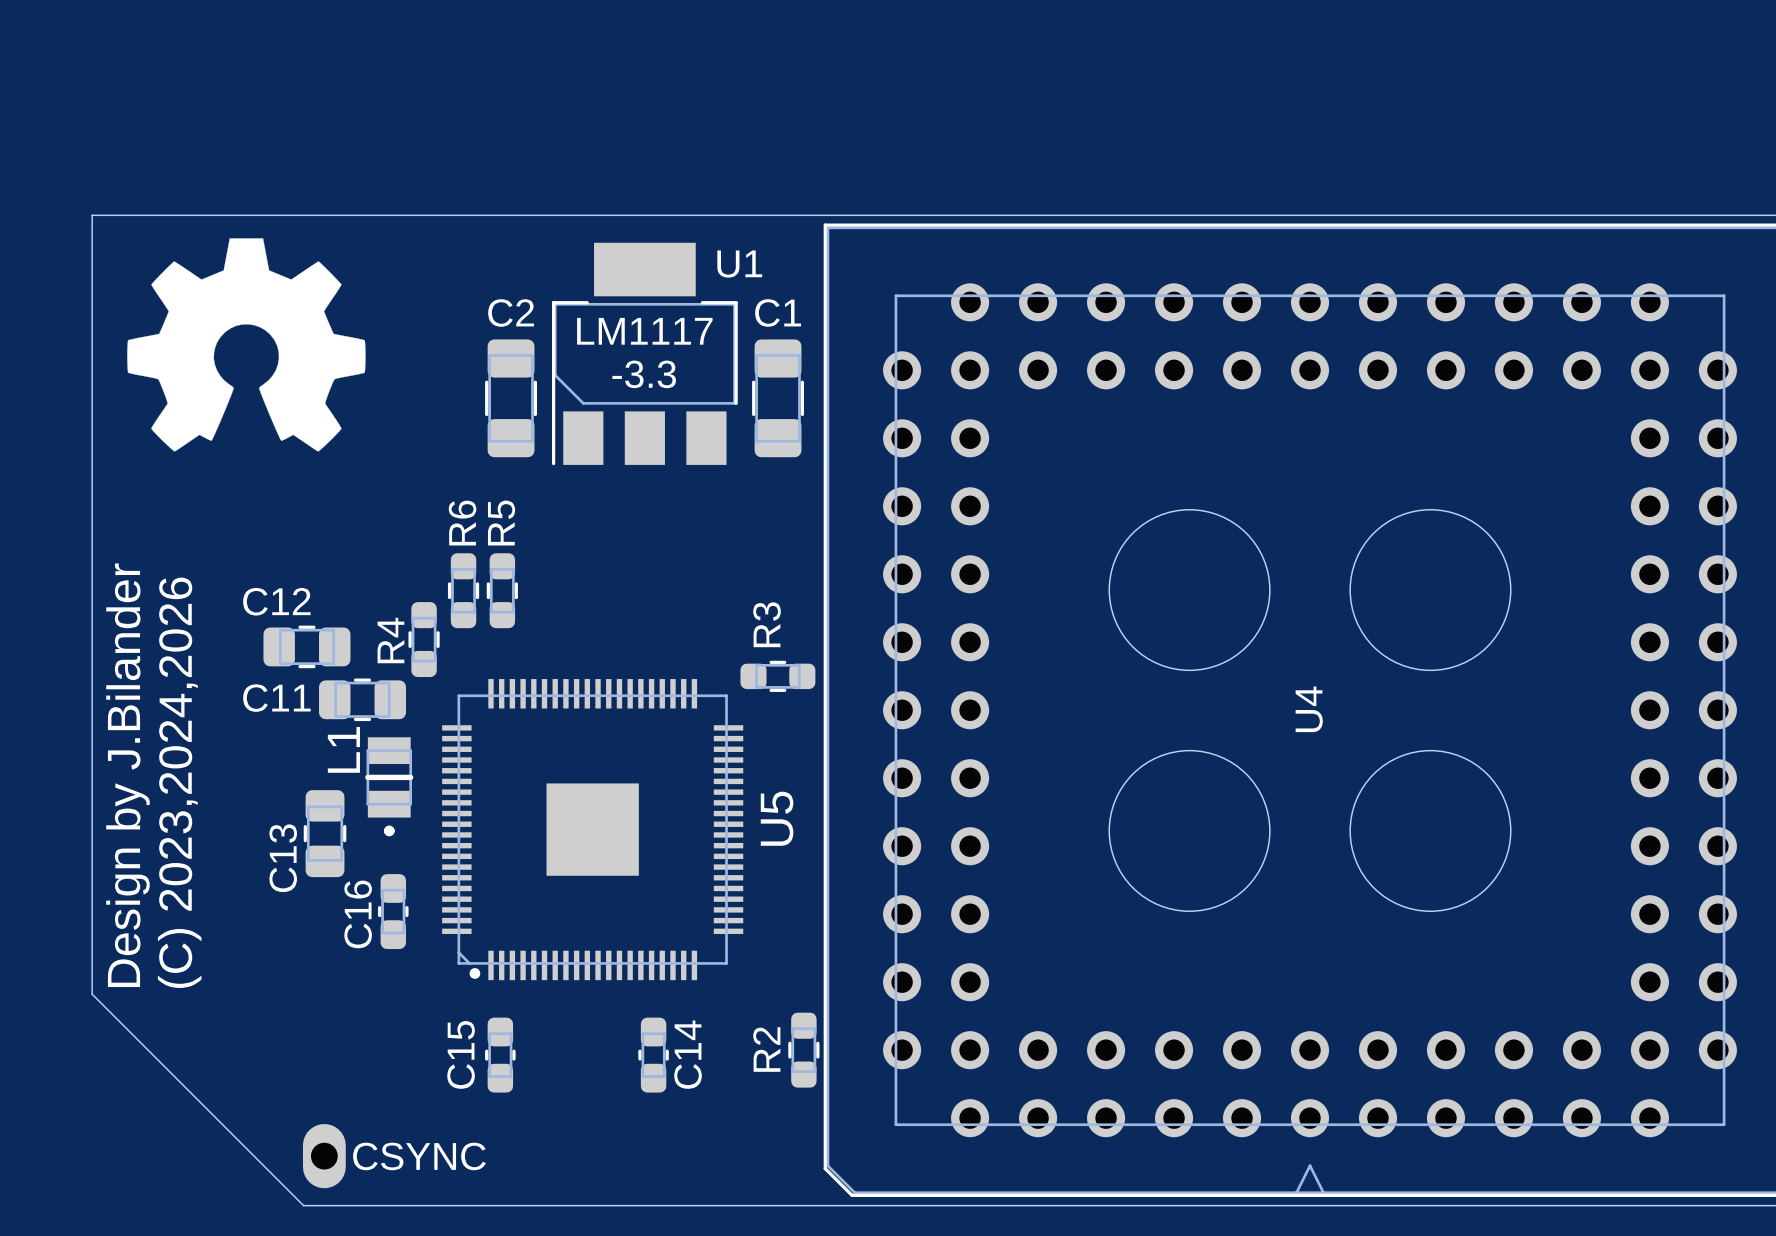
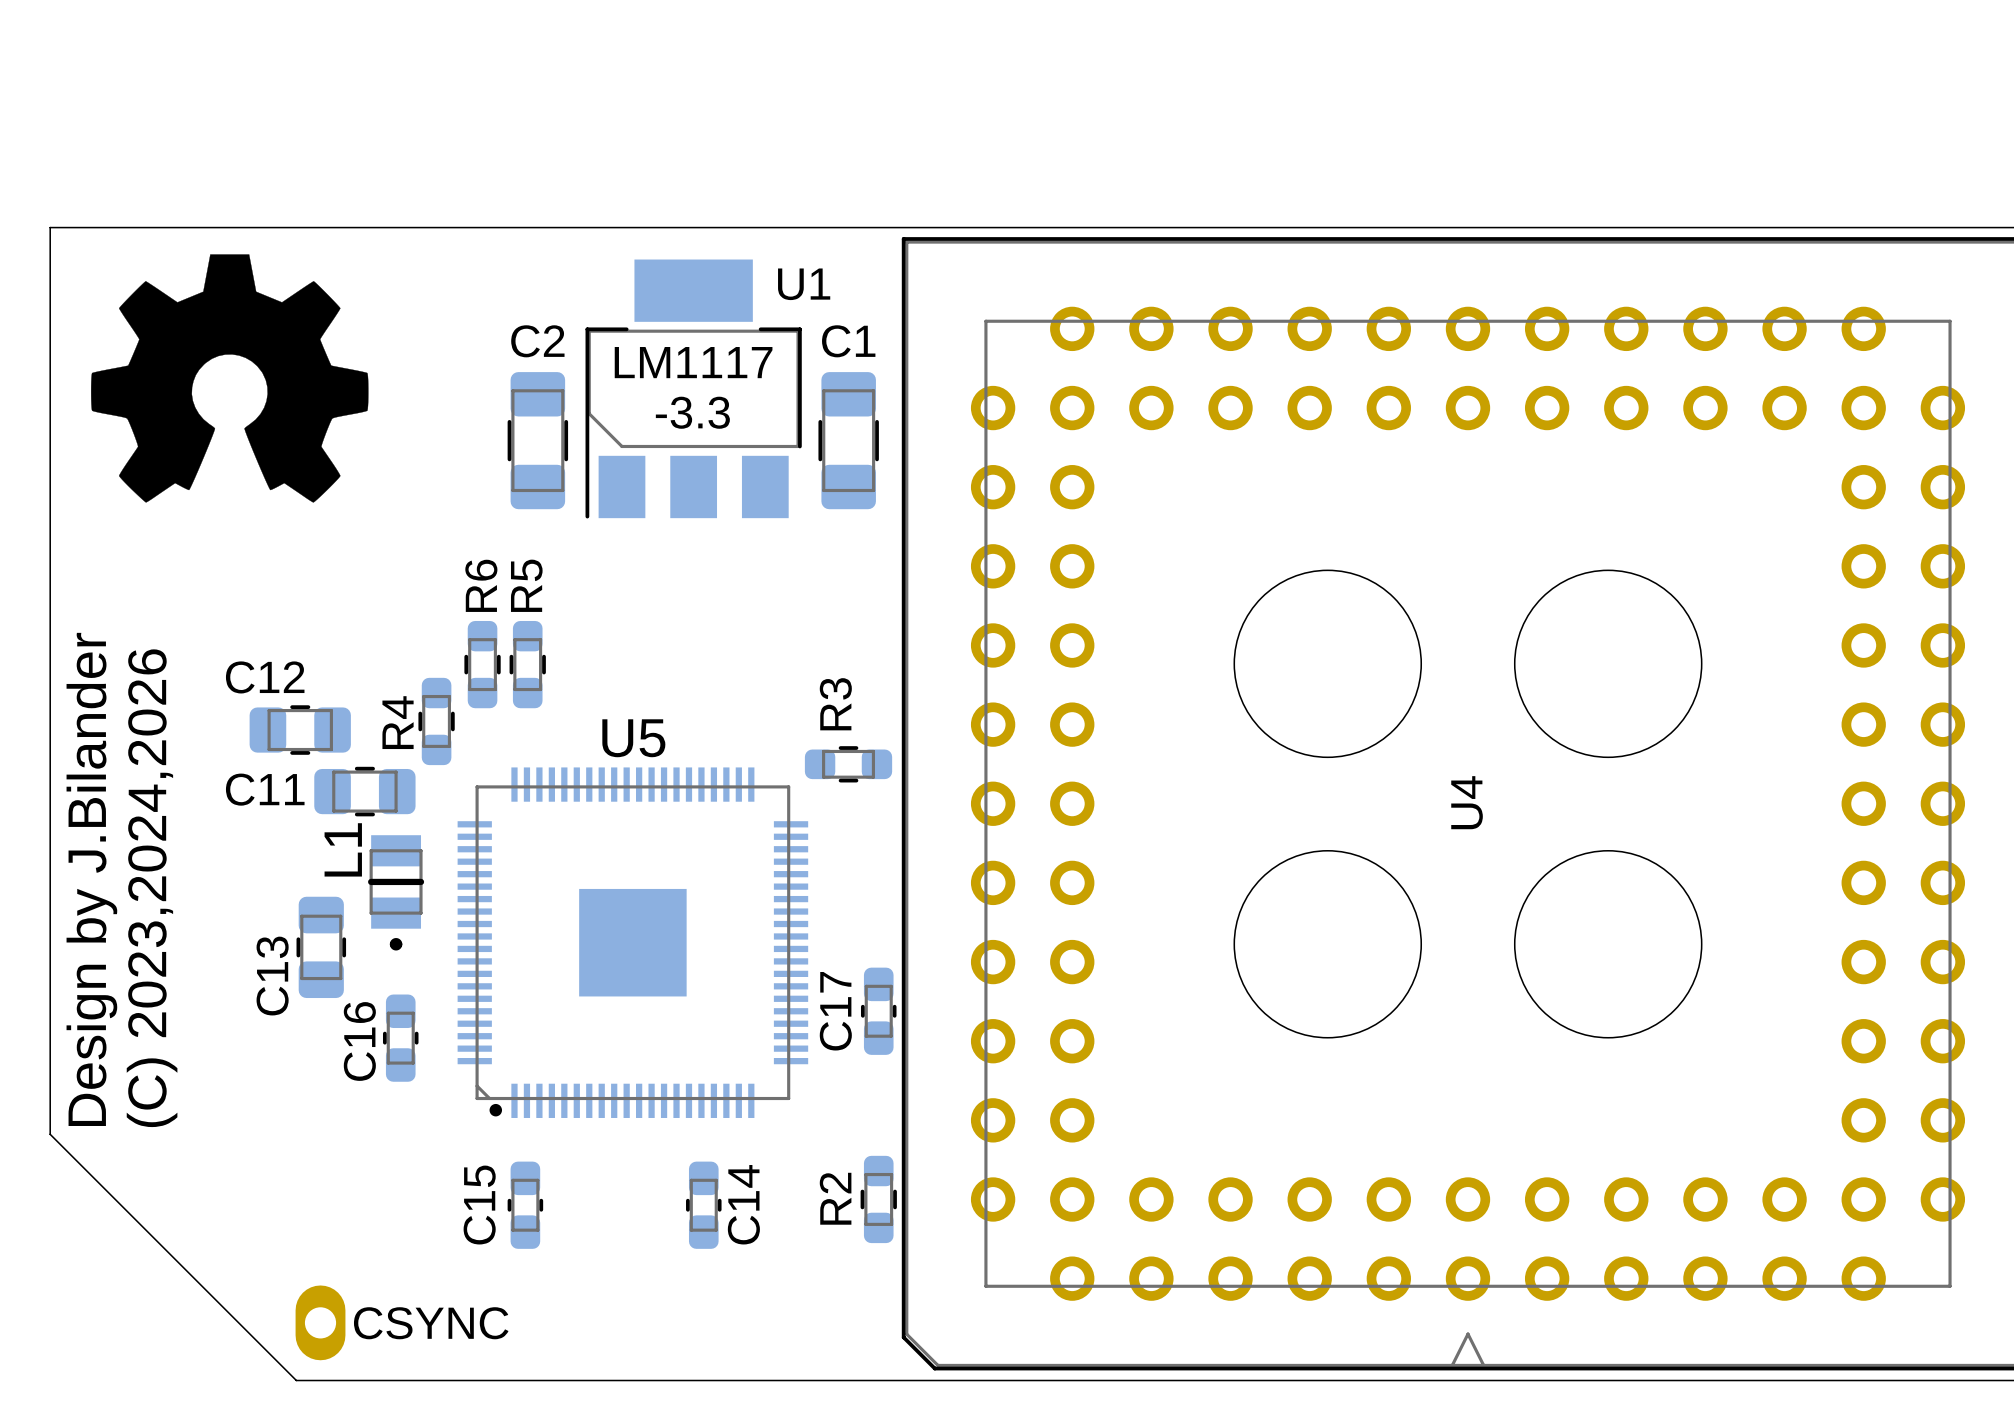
U5 name rotation: 0° (777, 818) -> 90° clockwise (633, 738)
U5 name position: U5 (777, 818) -> U5 (633, 738)
C17: none -> (878, 1011)

